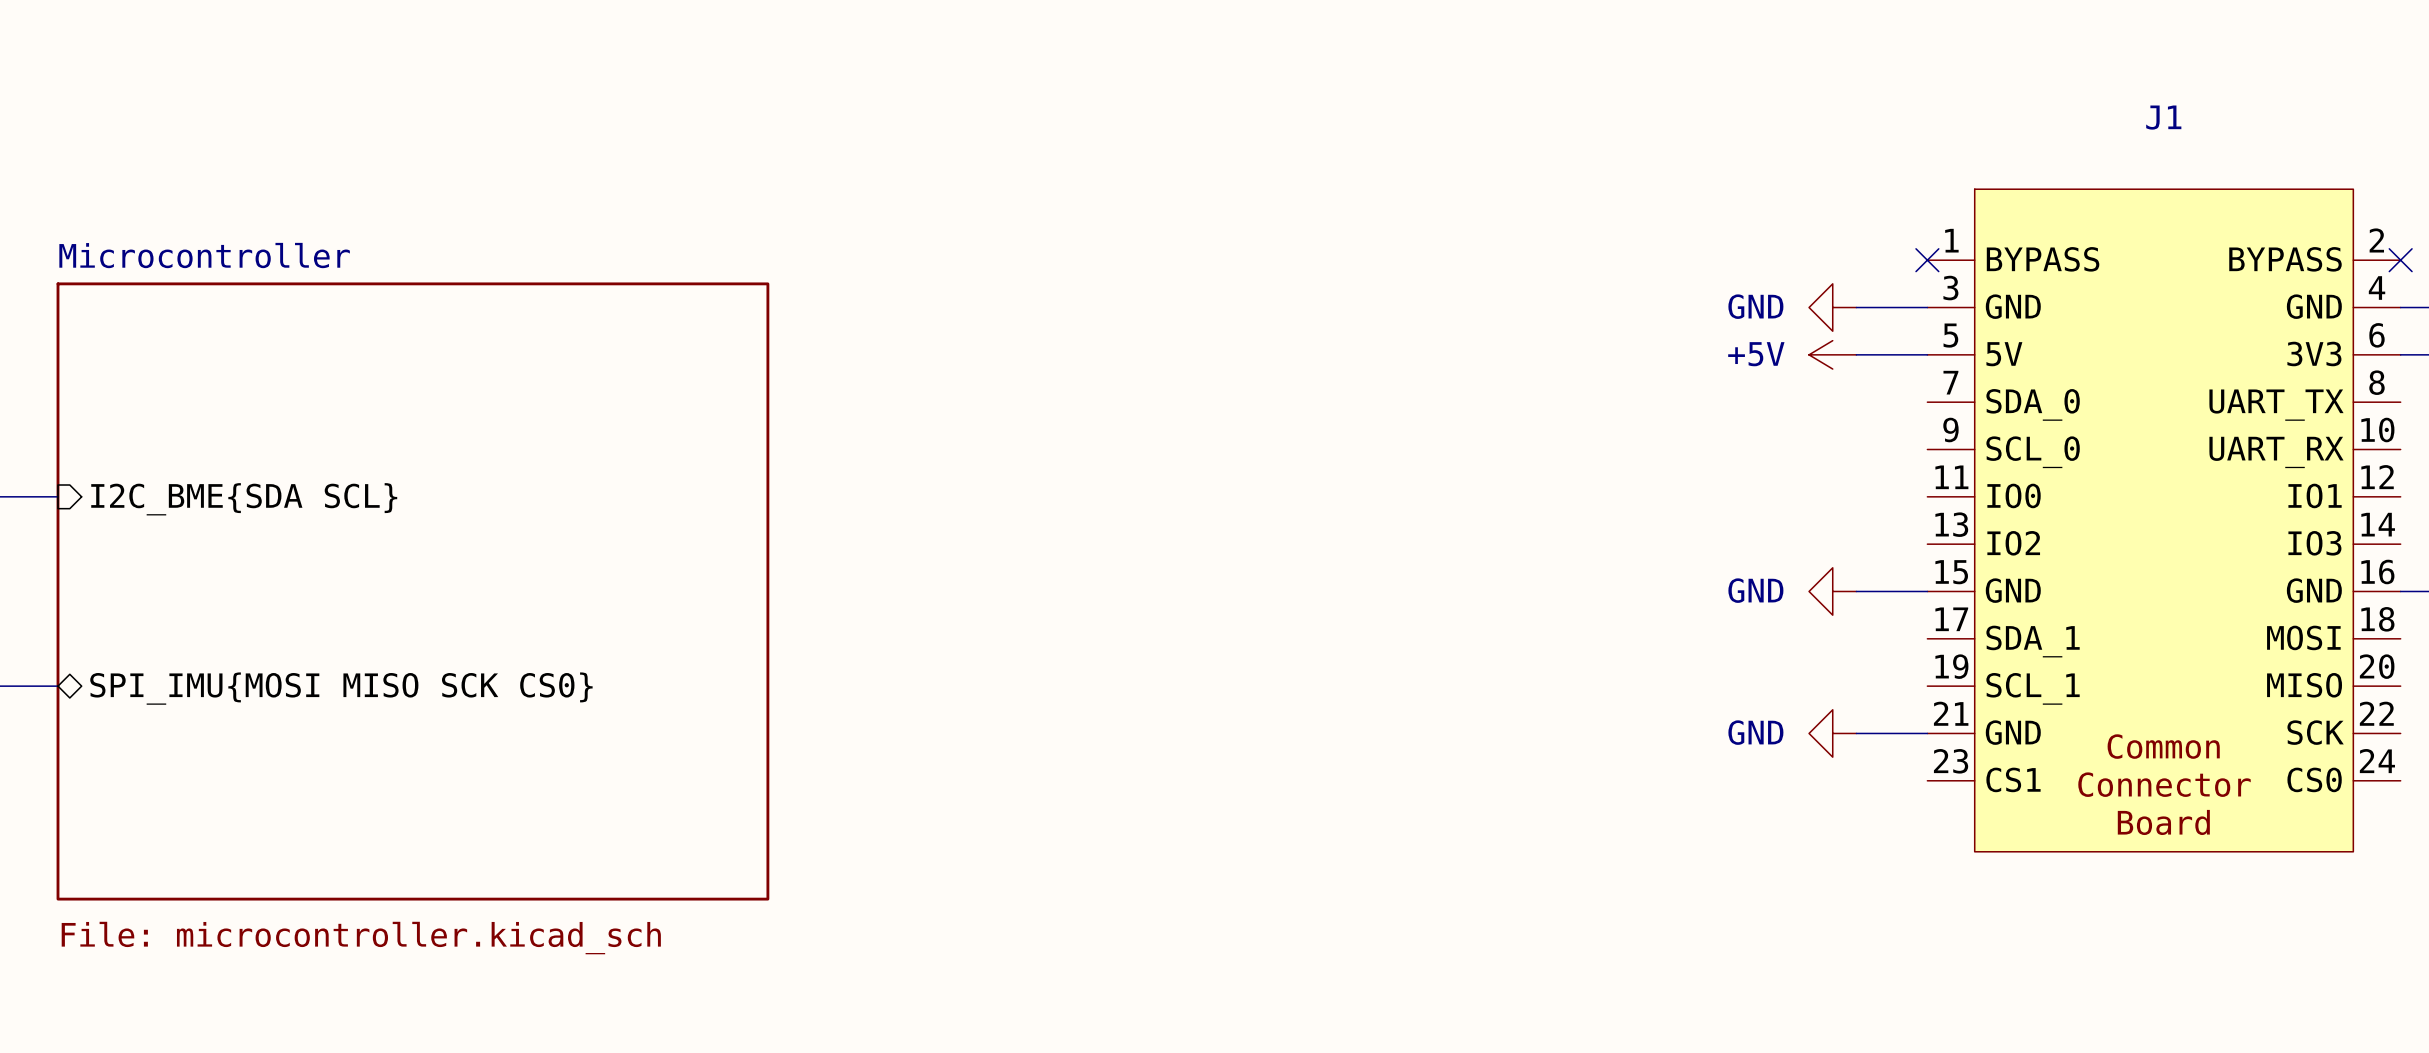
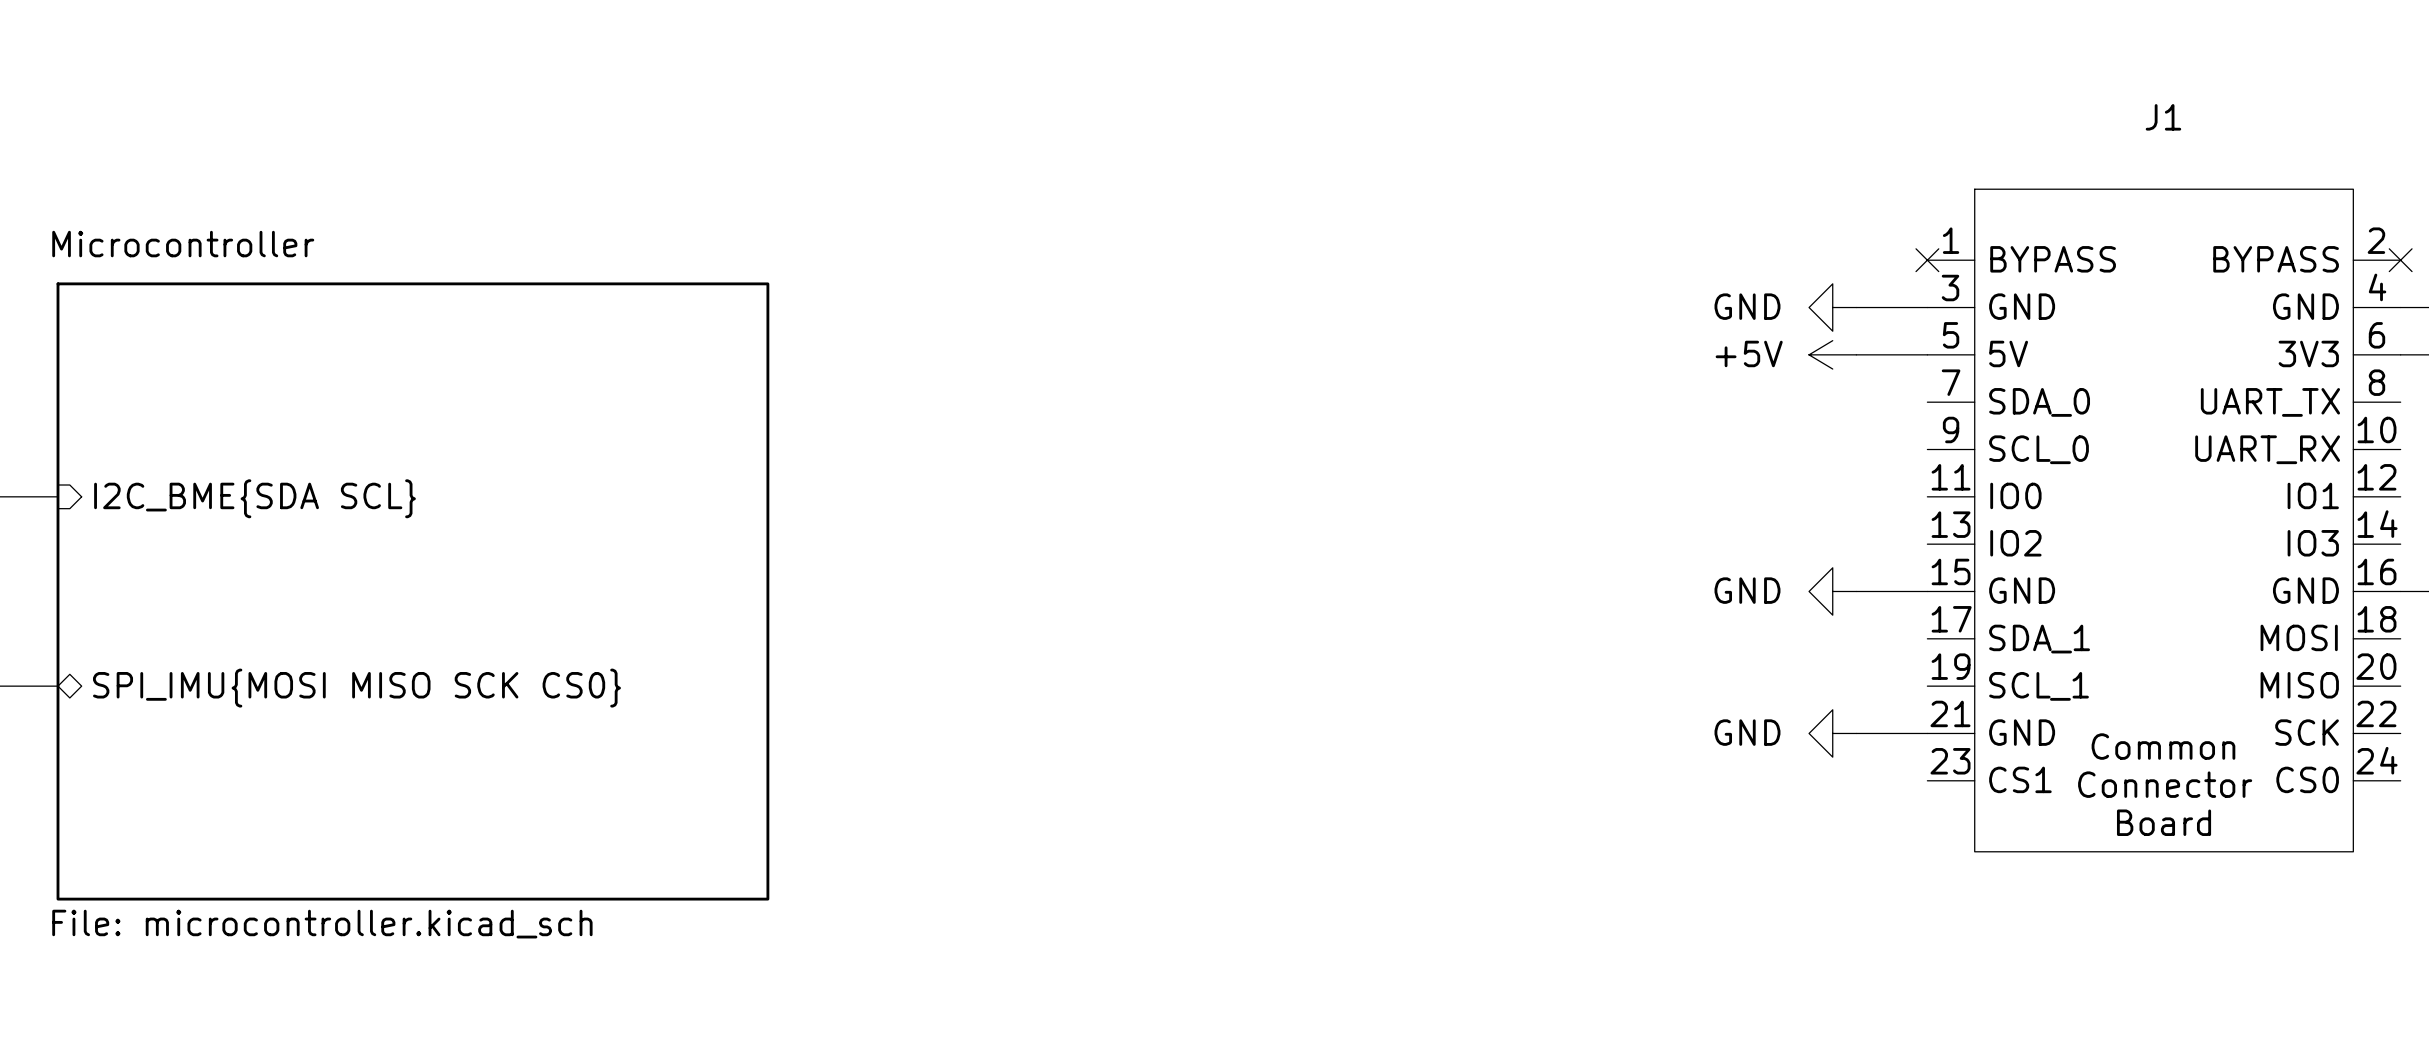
sheet Microcontroller name position: Microcontroller (204, 255) -> Microcontroller (183, 244)
sheet Microcontroller value position: File: microcontroller.kicad_sch (361, 938) -> File: microcontroller.kicad_sch (322, 924)

